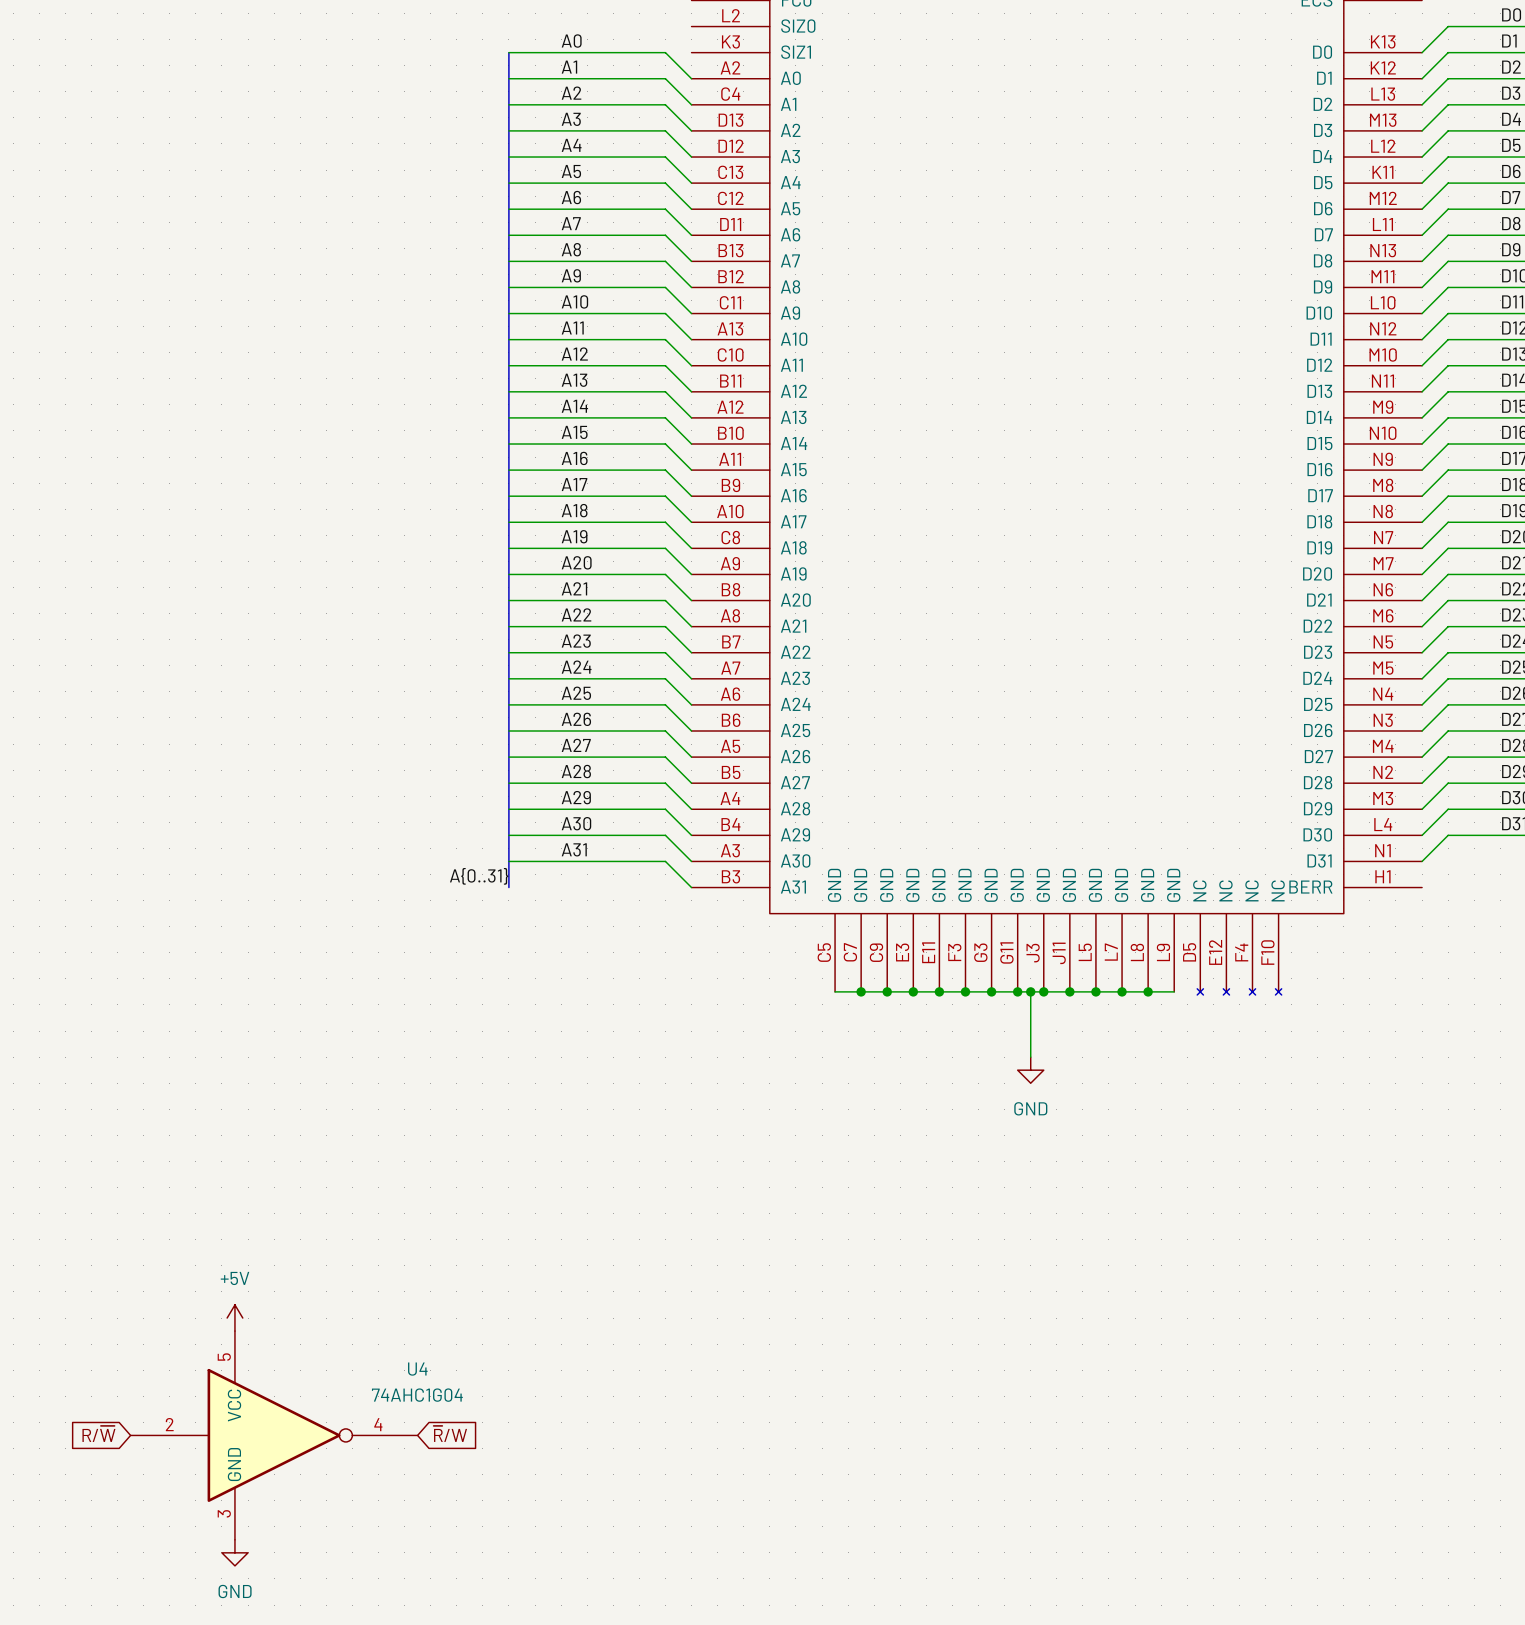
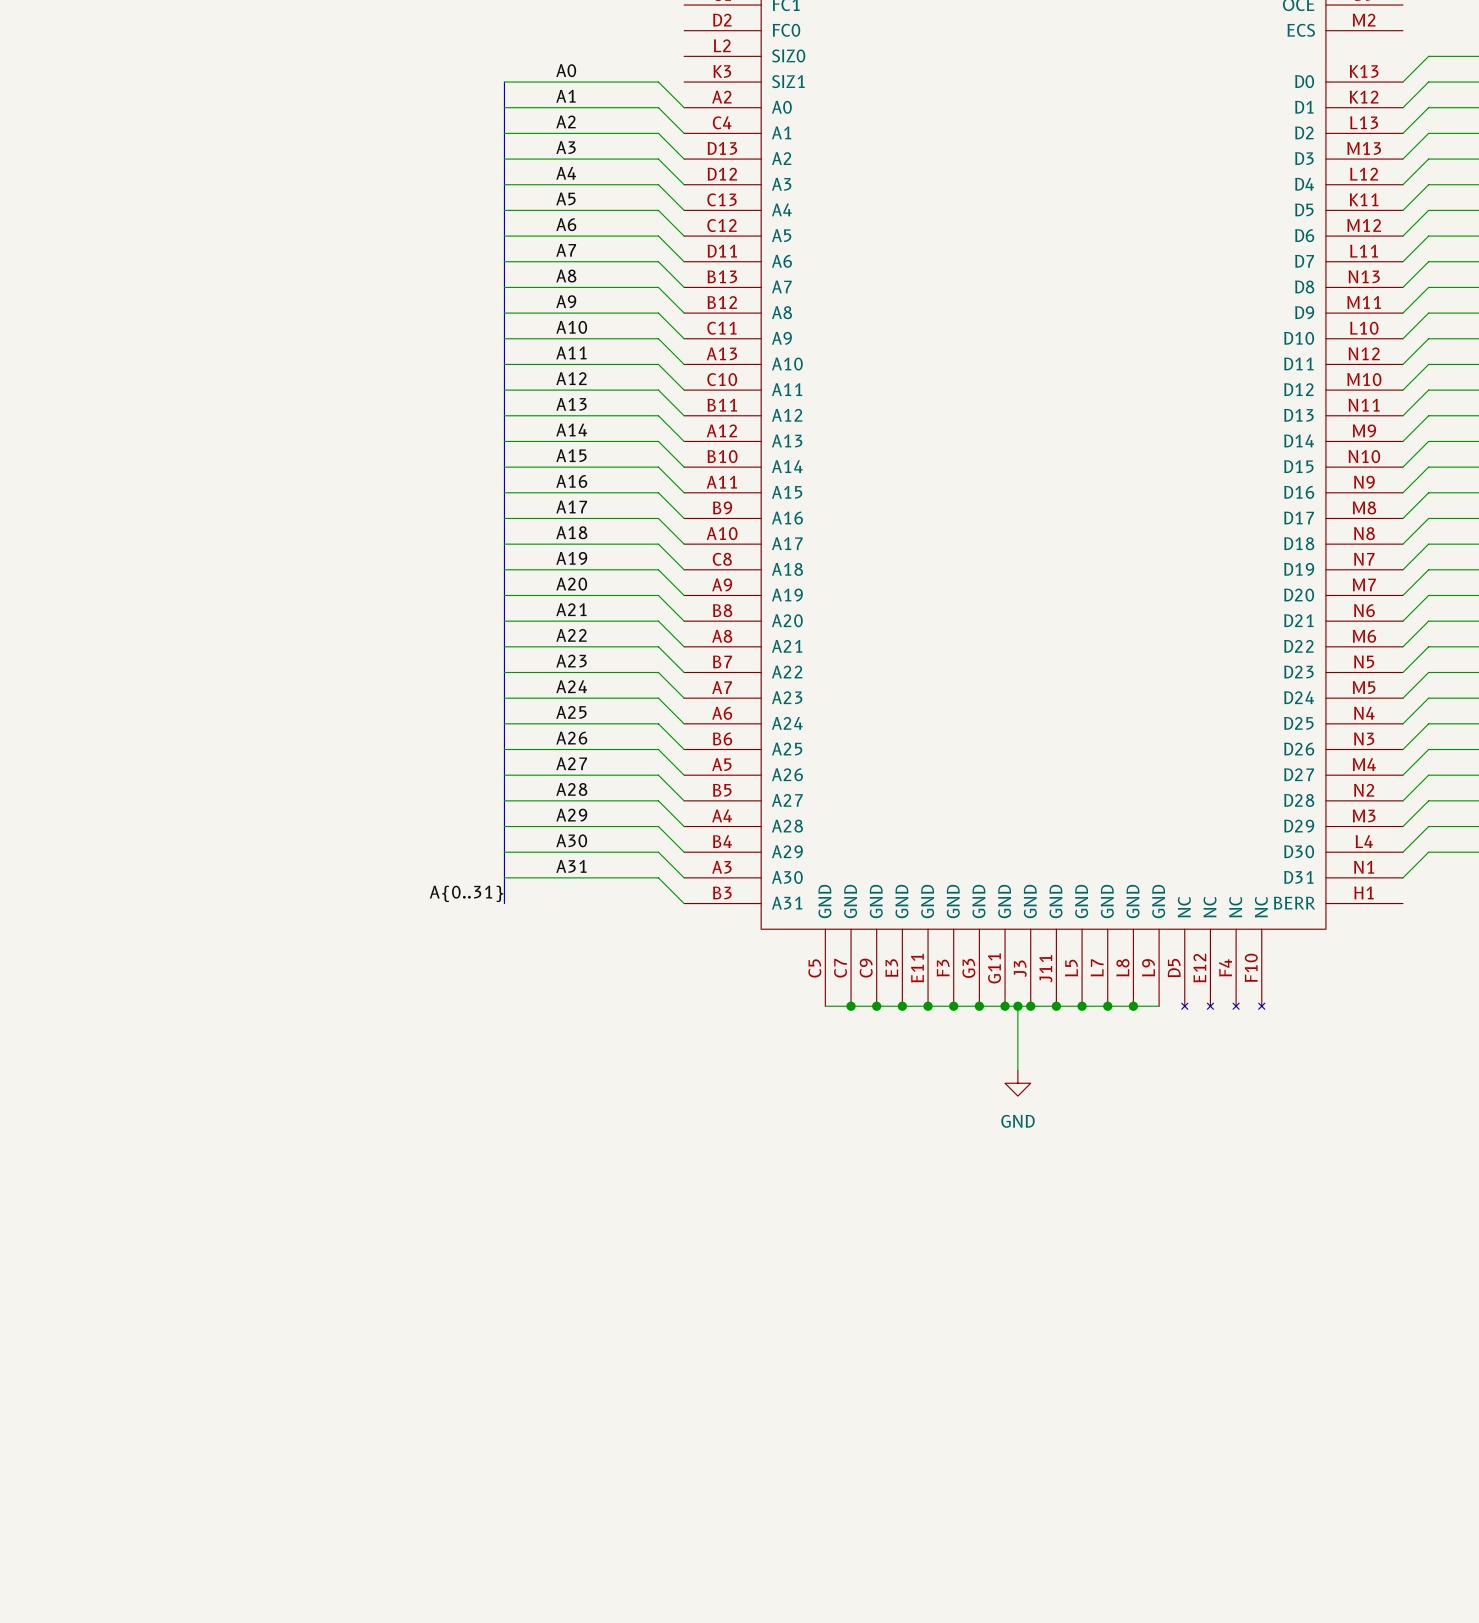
power symbol: +5V (234, 1318) -> none
global label: R/~{W} (98, 1433) -> none
global label: ~{R}/W (450, 1433) -> none
U4: 74AHC1G04 (274, 1435) -> none
power symbol: GND (234, 1552) -> none

